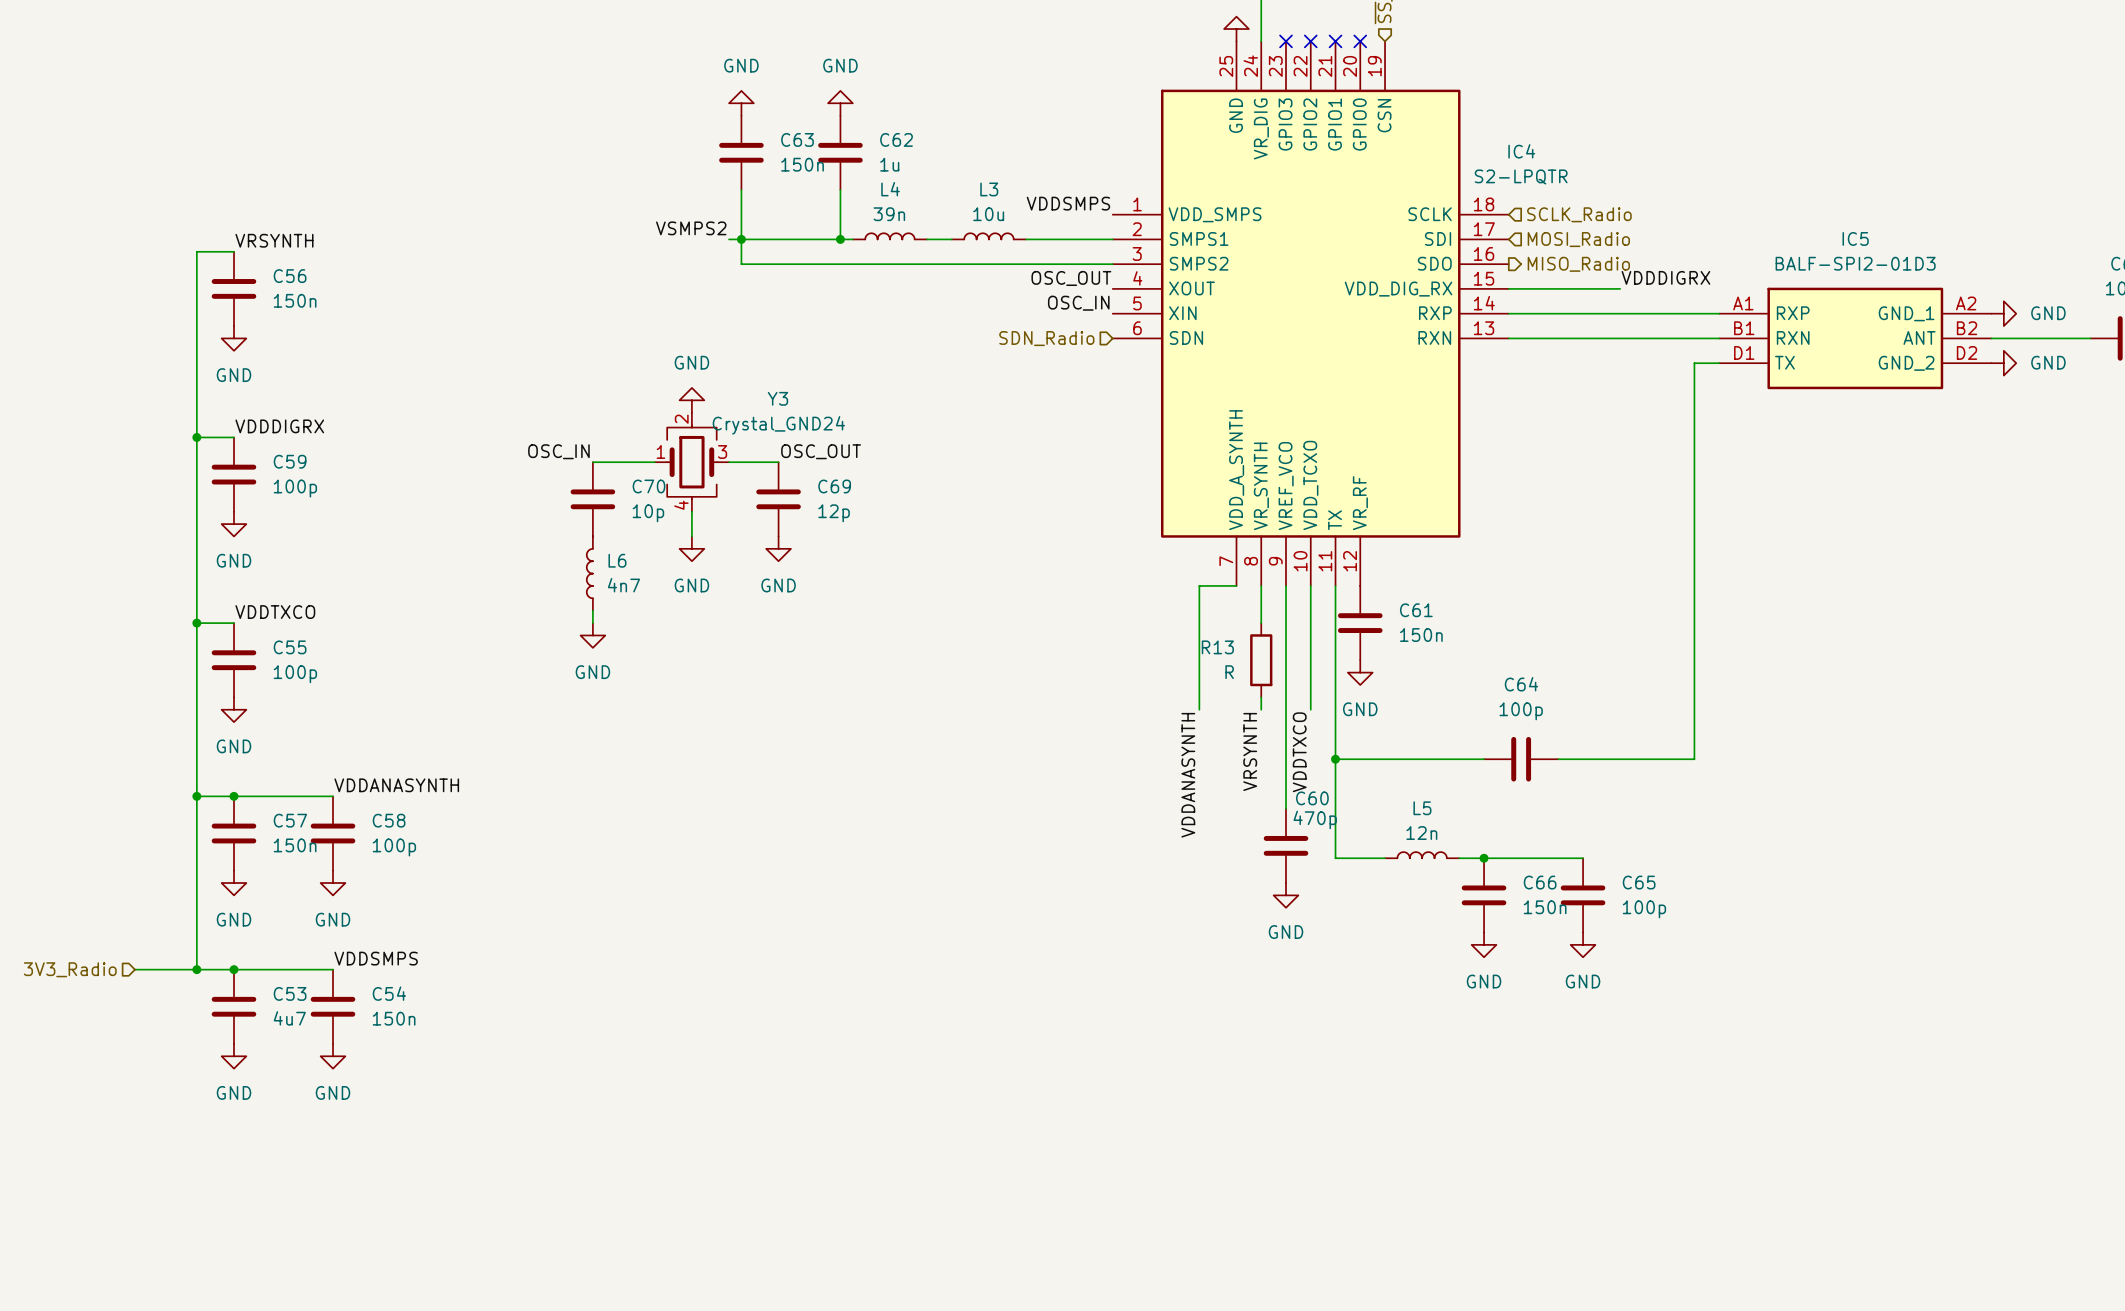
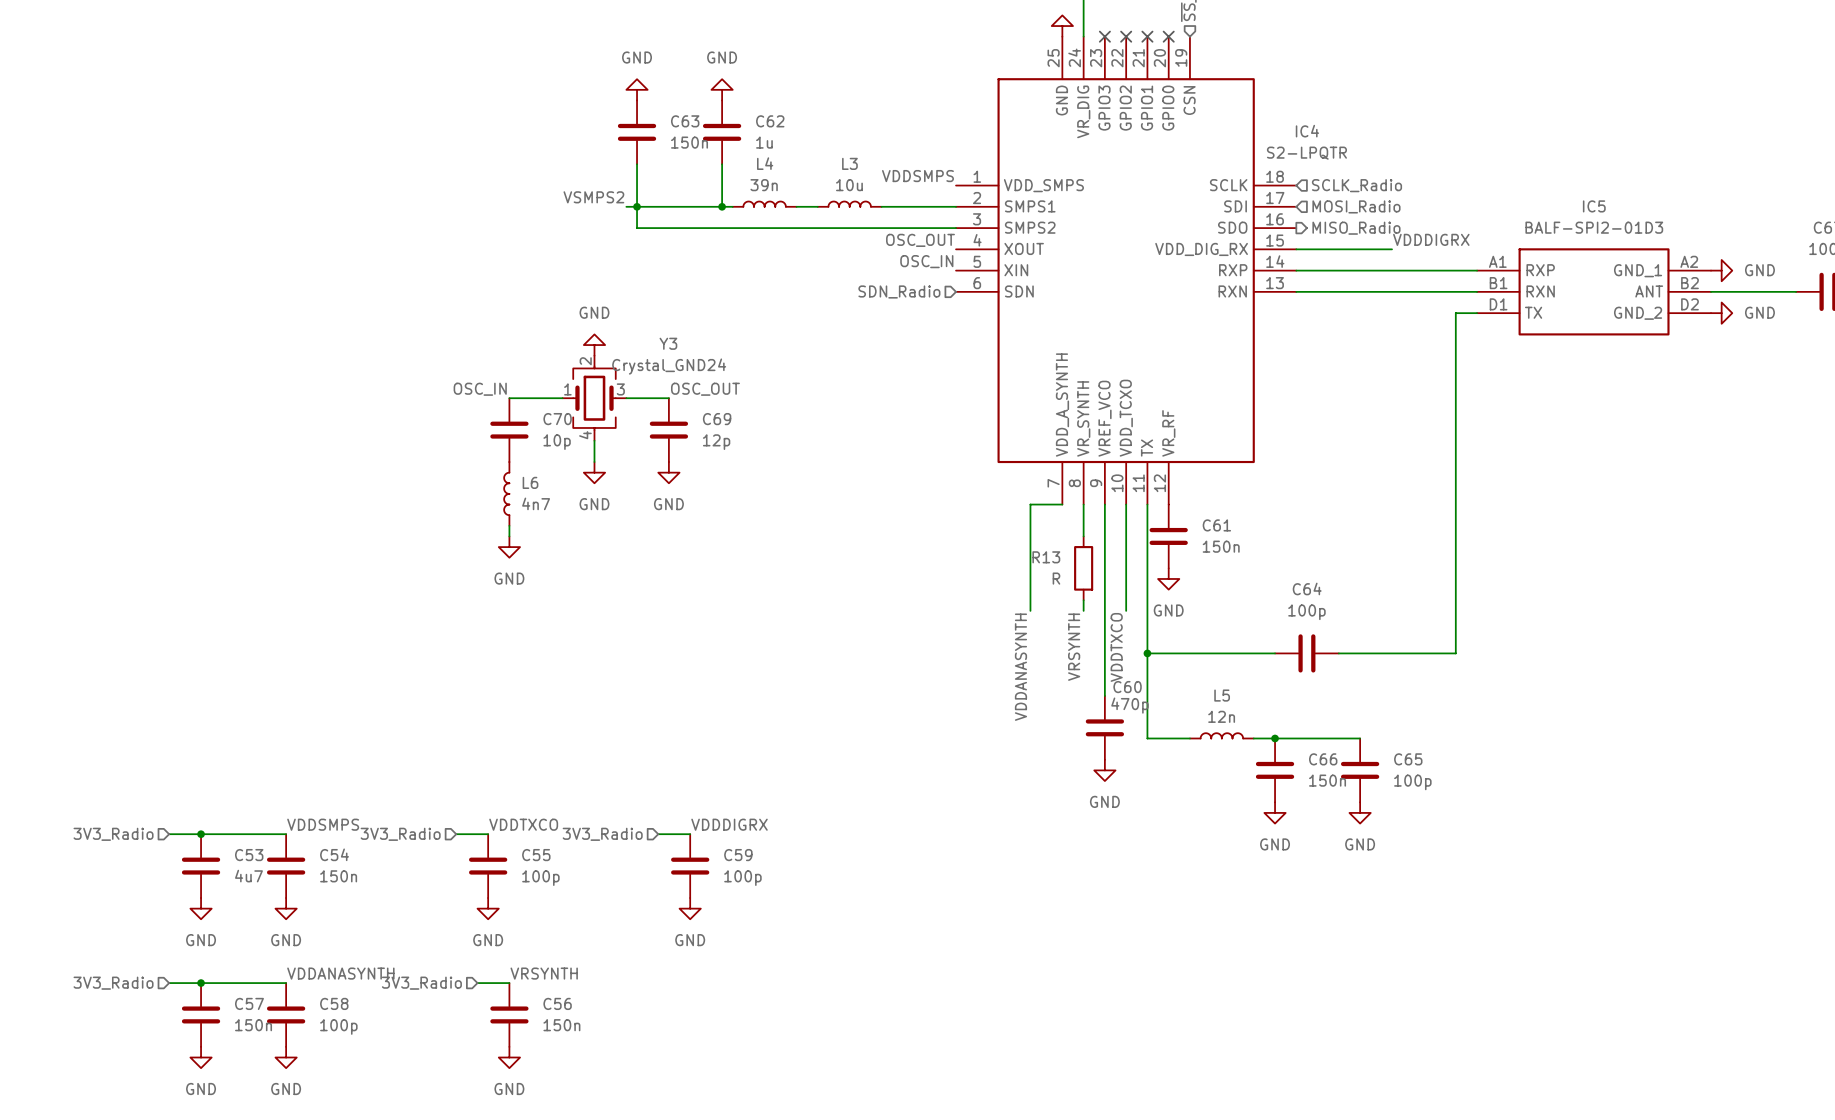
label: VRSYNTH (274, 240) -> none
wire: (233, 251) (196, 251) (196, 969) (134, 969) -> none
C56 position: (233, 288) -> (509, 1014)
power symbol: GND (233, 338) -> none
label: VDDDIGRX (279, 426) -> none
wire: (196, 437) (233, 437) -> none
junction: (196, 437) -> none
C59 position: (233, 474) -> (690, 866)
power symbol: GND (233, 524) -> none
label: VDDTXCO (275, 612) -> none
wire: (196, 623) (233, 623) -> none
junction: (196, 623) -> none
C55 position: (233, 660) -> (488, 866)
power symbol: GND (233, 709) -> none
label: VDDANASYNTH (396, 785) -> none
wire: (196, 796) (333, 796) -> none
junction: (196, 796) -> none
junction: (233, 796) -> none
C57 position: (233, 833) -> (201, 1014)
C58 position: (333, 833) -> (286, 1014)
power symbol: GND (233, 883) -> none
power symbol: GND (333, 883) -> none
label: none -> VDDTXCO (523, 824)
label: none -> VDDDIGRX (729, 824)
hierarchical label position: 3V3_Radio (70, 969) -> 3V3_Radio (113, 834)
junction: (196, 969) -> none
hierarchical label: none -> 3V3_Radio (400, 834)
wire: none -> (456, 834) (488, 834)
hierarchical label: none -> 3V3_Radio (602, 834)
wire: none -> (658, 834) (690, 834)
power symbol: none -> GND (488, 908)
power symbol: none -> GND (690, 908)
label: none -> VDDANASYNTH (340, 973)
label: none -> VRSYNTH (544, 973)
wire: none -> (169, 983) (286, 983)
junction: none -> (201, 983)
wire: none -> (477, 983) (509, 983)
hierarchical label: none -> 3V3_Radio (113, 983)
hierarchical label: none -> 3V3_Radio (421, 983)
power symbol: none -> GND (201, 1057)
power symbol: none -> GND (286, 1057)
power symbol: none -> GND (509, 1057)

